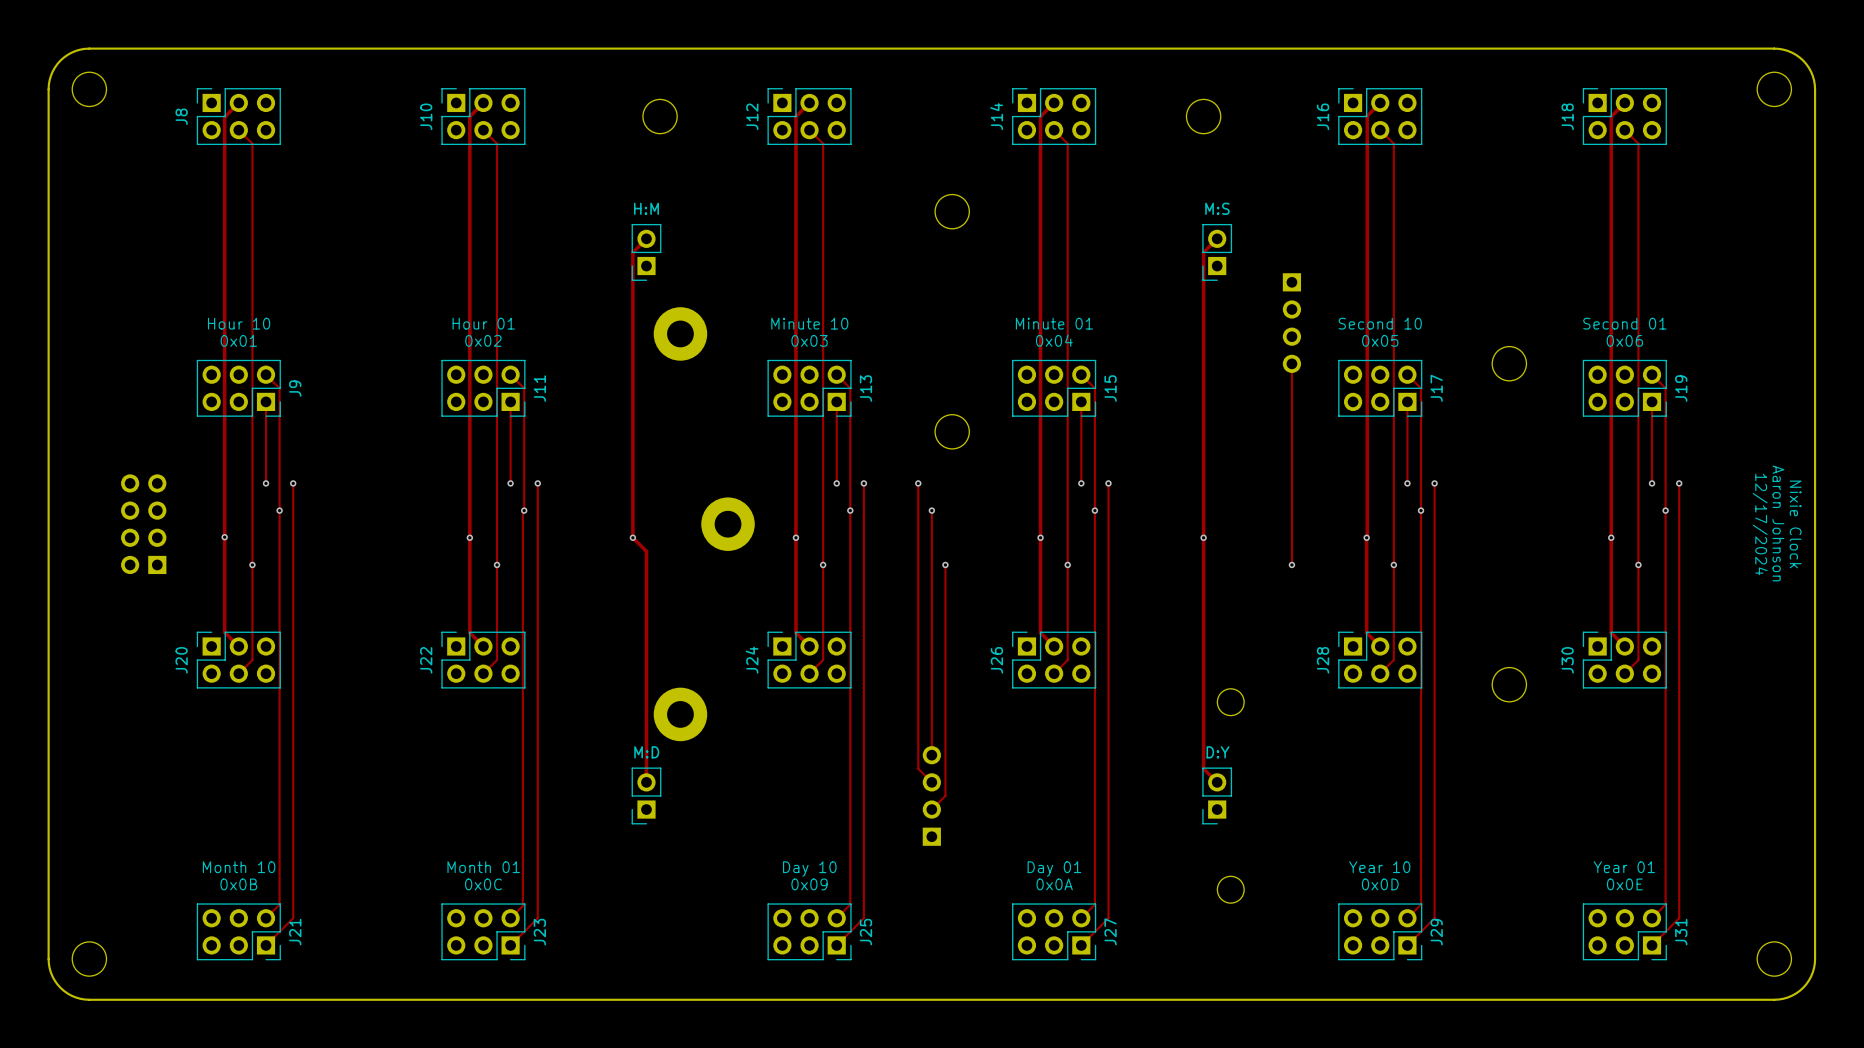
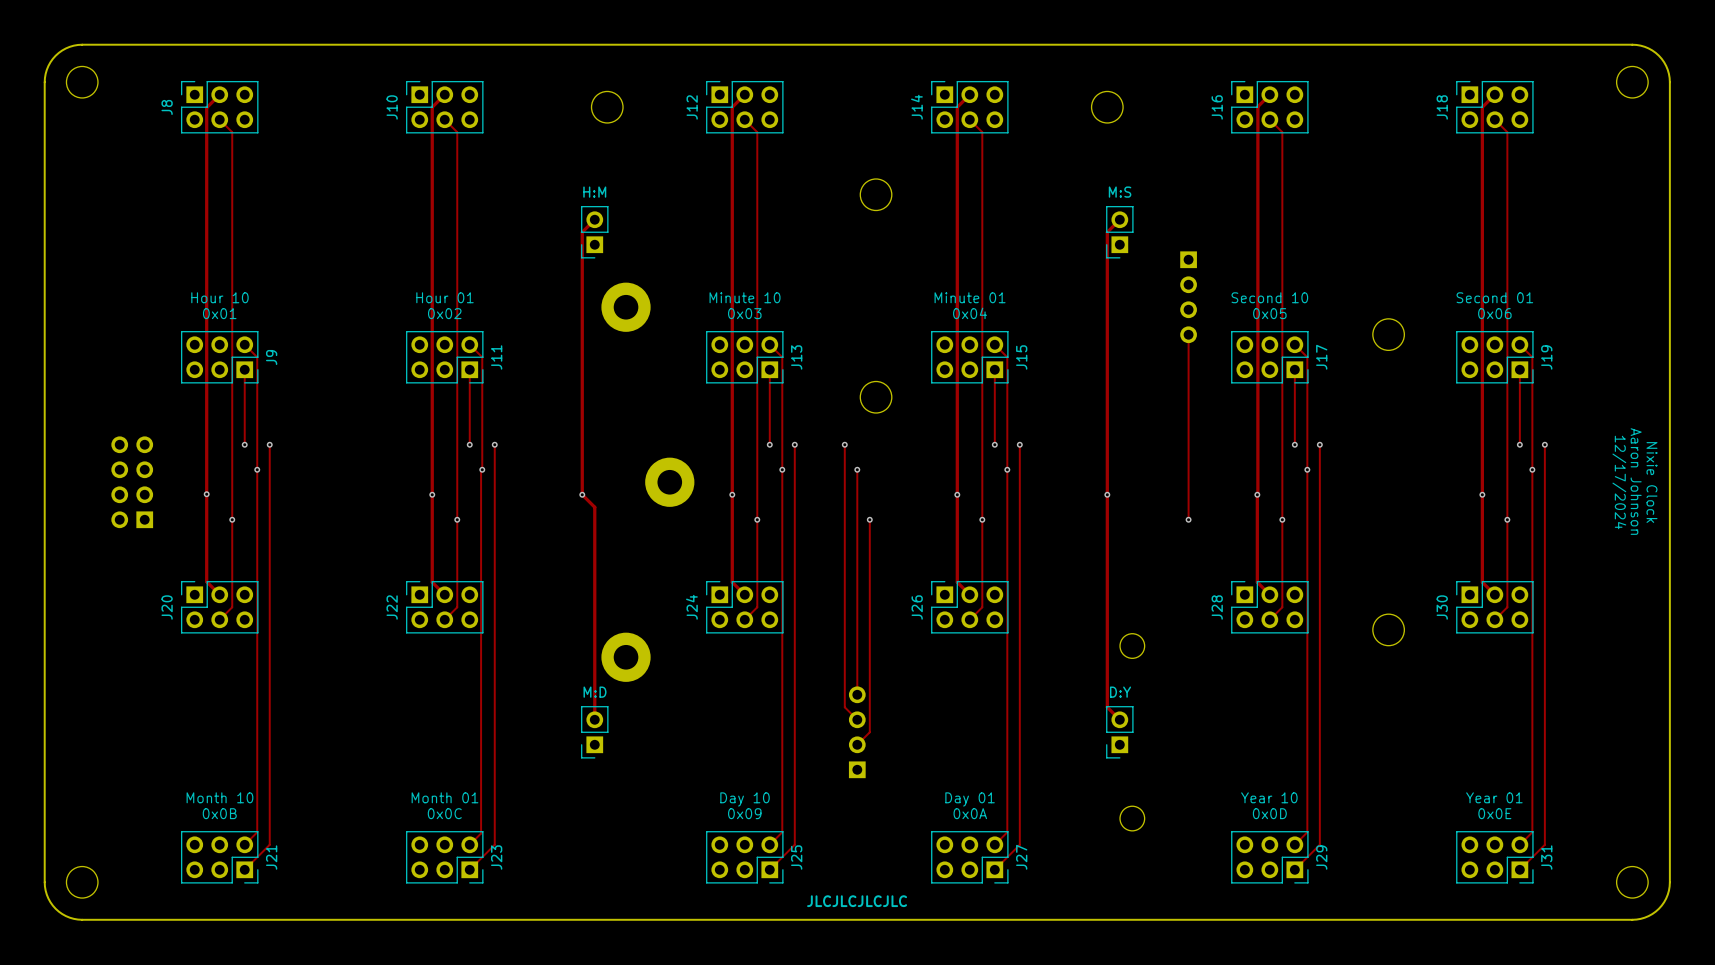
text: none -> JLCJLCJLCJLC (857, 901)

